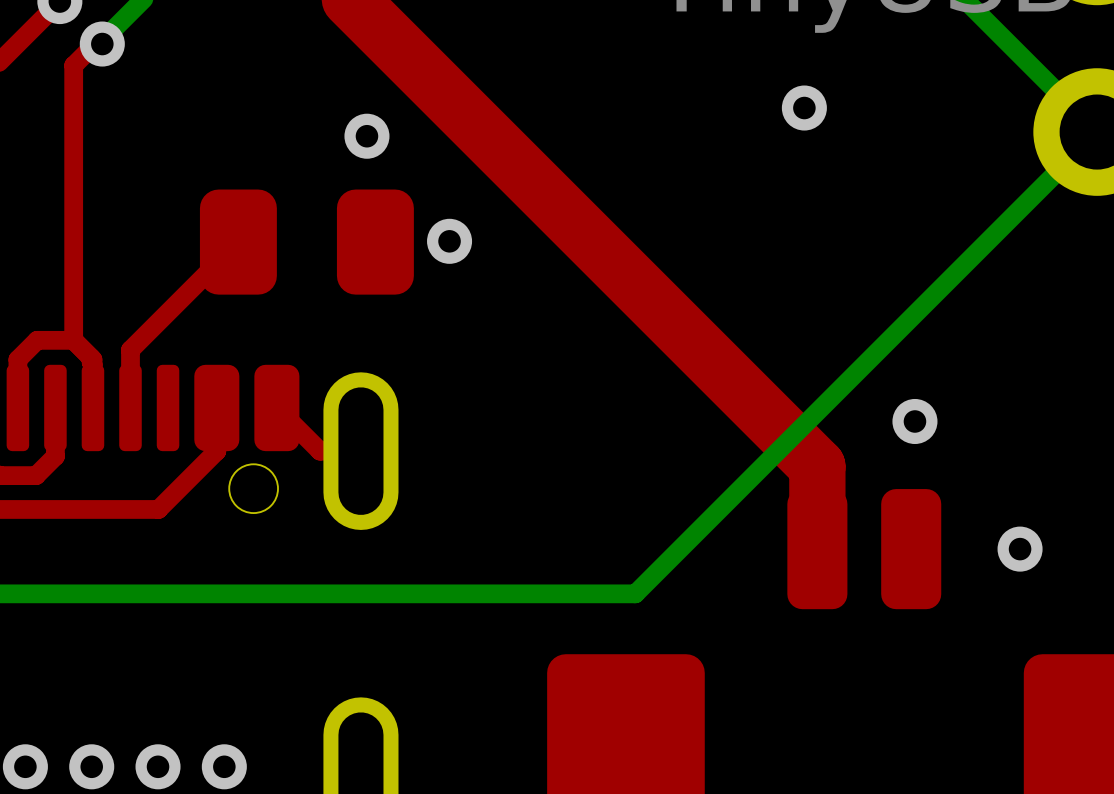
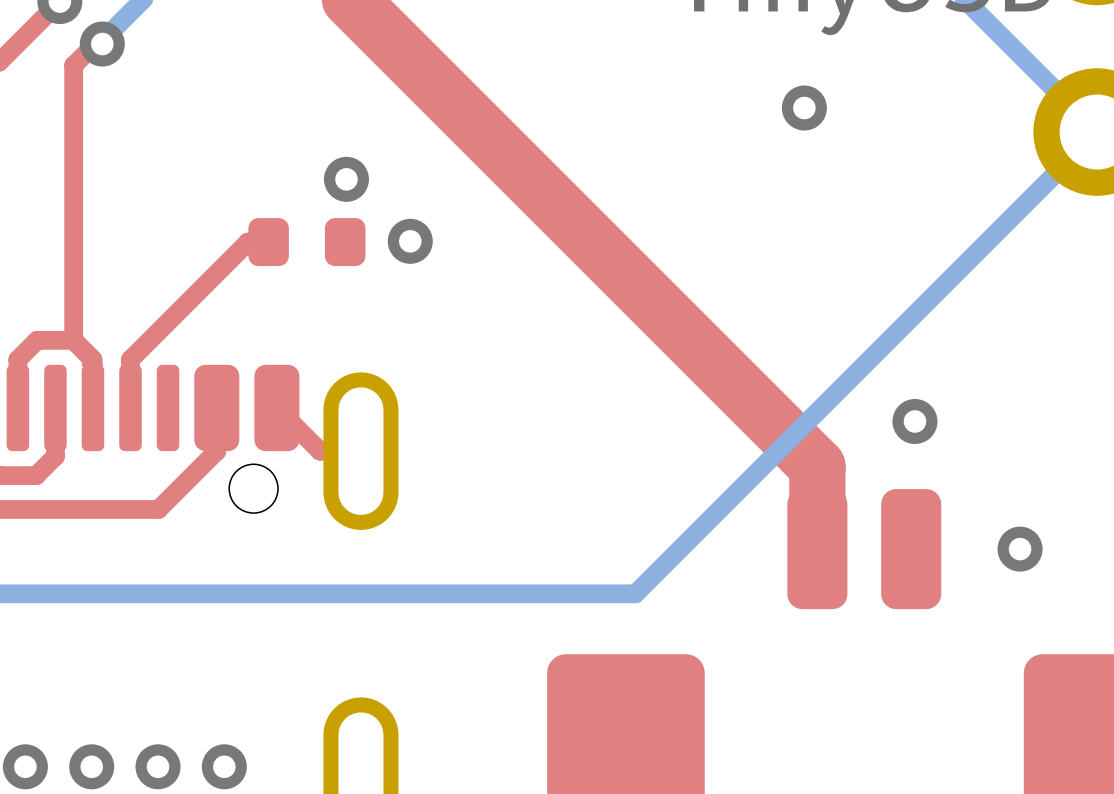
via position: (366, 136) -> (346, 179)
part footprint: [199, 189, 414, 295] -> [248, 218, 366, 267]
via position: (449, 241) -> (410, 241)
top track: (238, 242) (130, 349) (130, 359) -> (268, 242) (248, 242) (130, 359)

